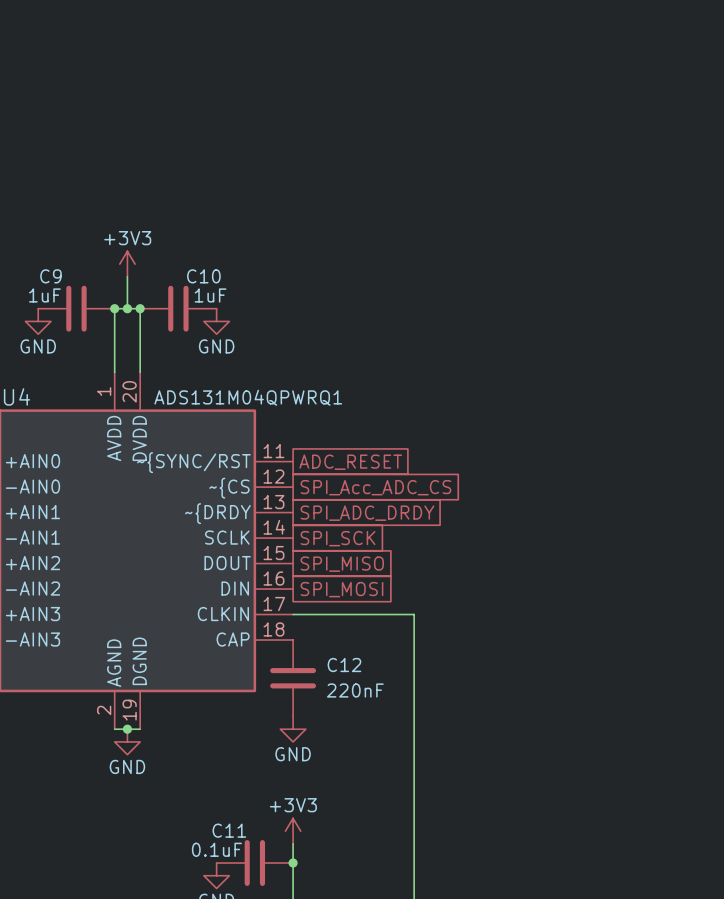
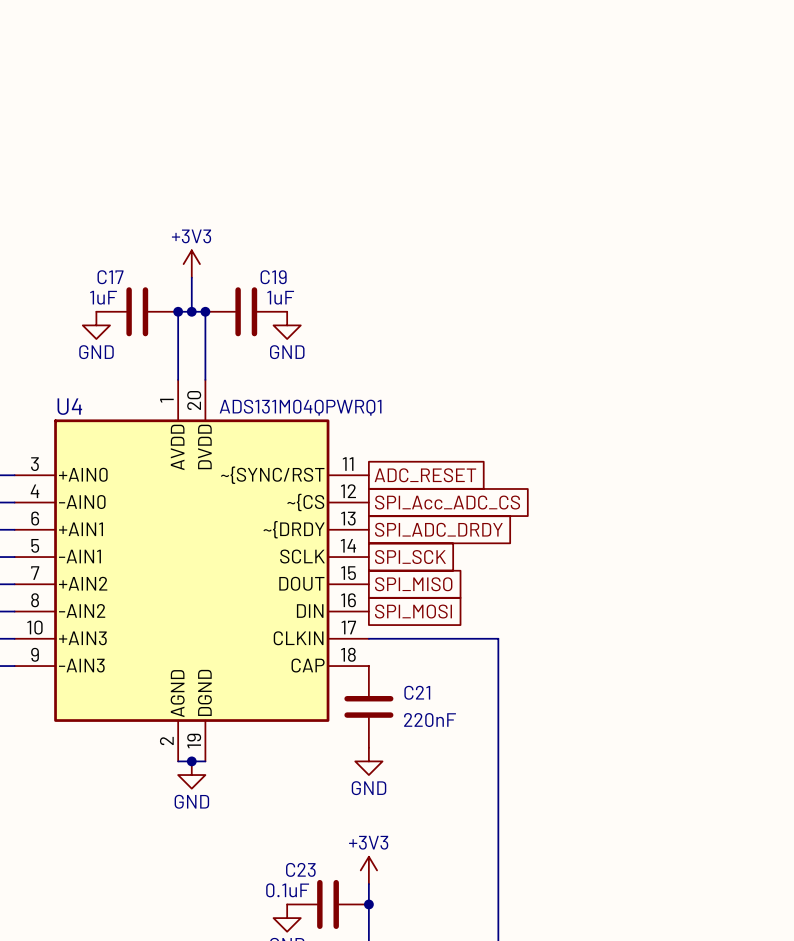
C9 name: C9 (50, 276) -> C17 (110, 277)
C10 name: C10 (203, 276) -> C19 (273, 277)
C12 name: C12 (344, 665) -> C21 (417, 692)
C11 name: C11 (229, 830) -> C23 (300, 869)

